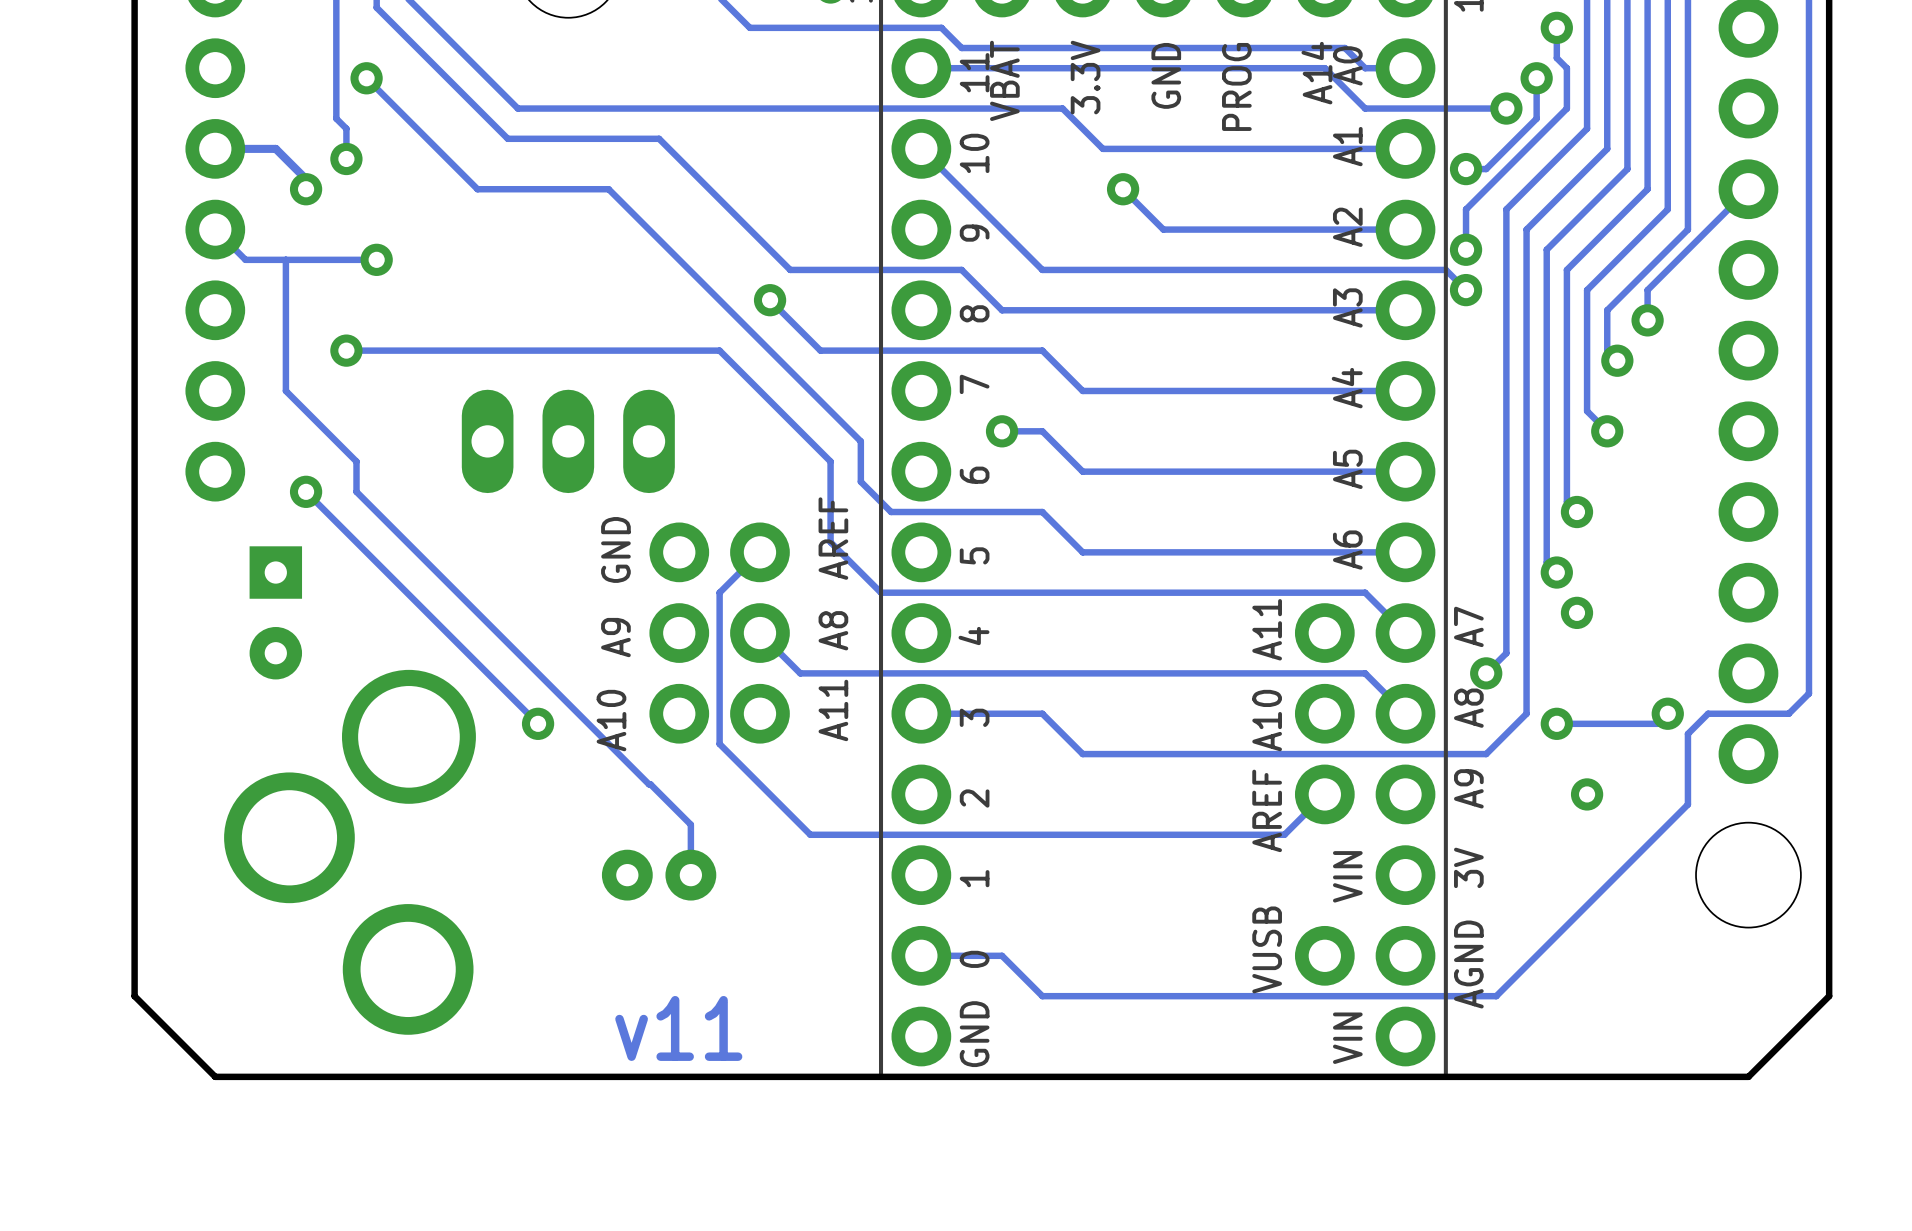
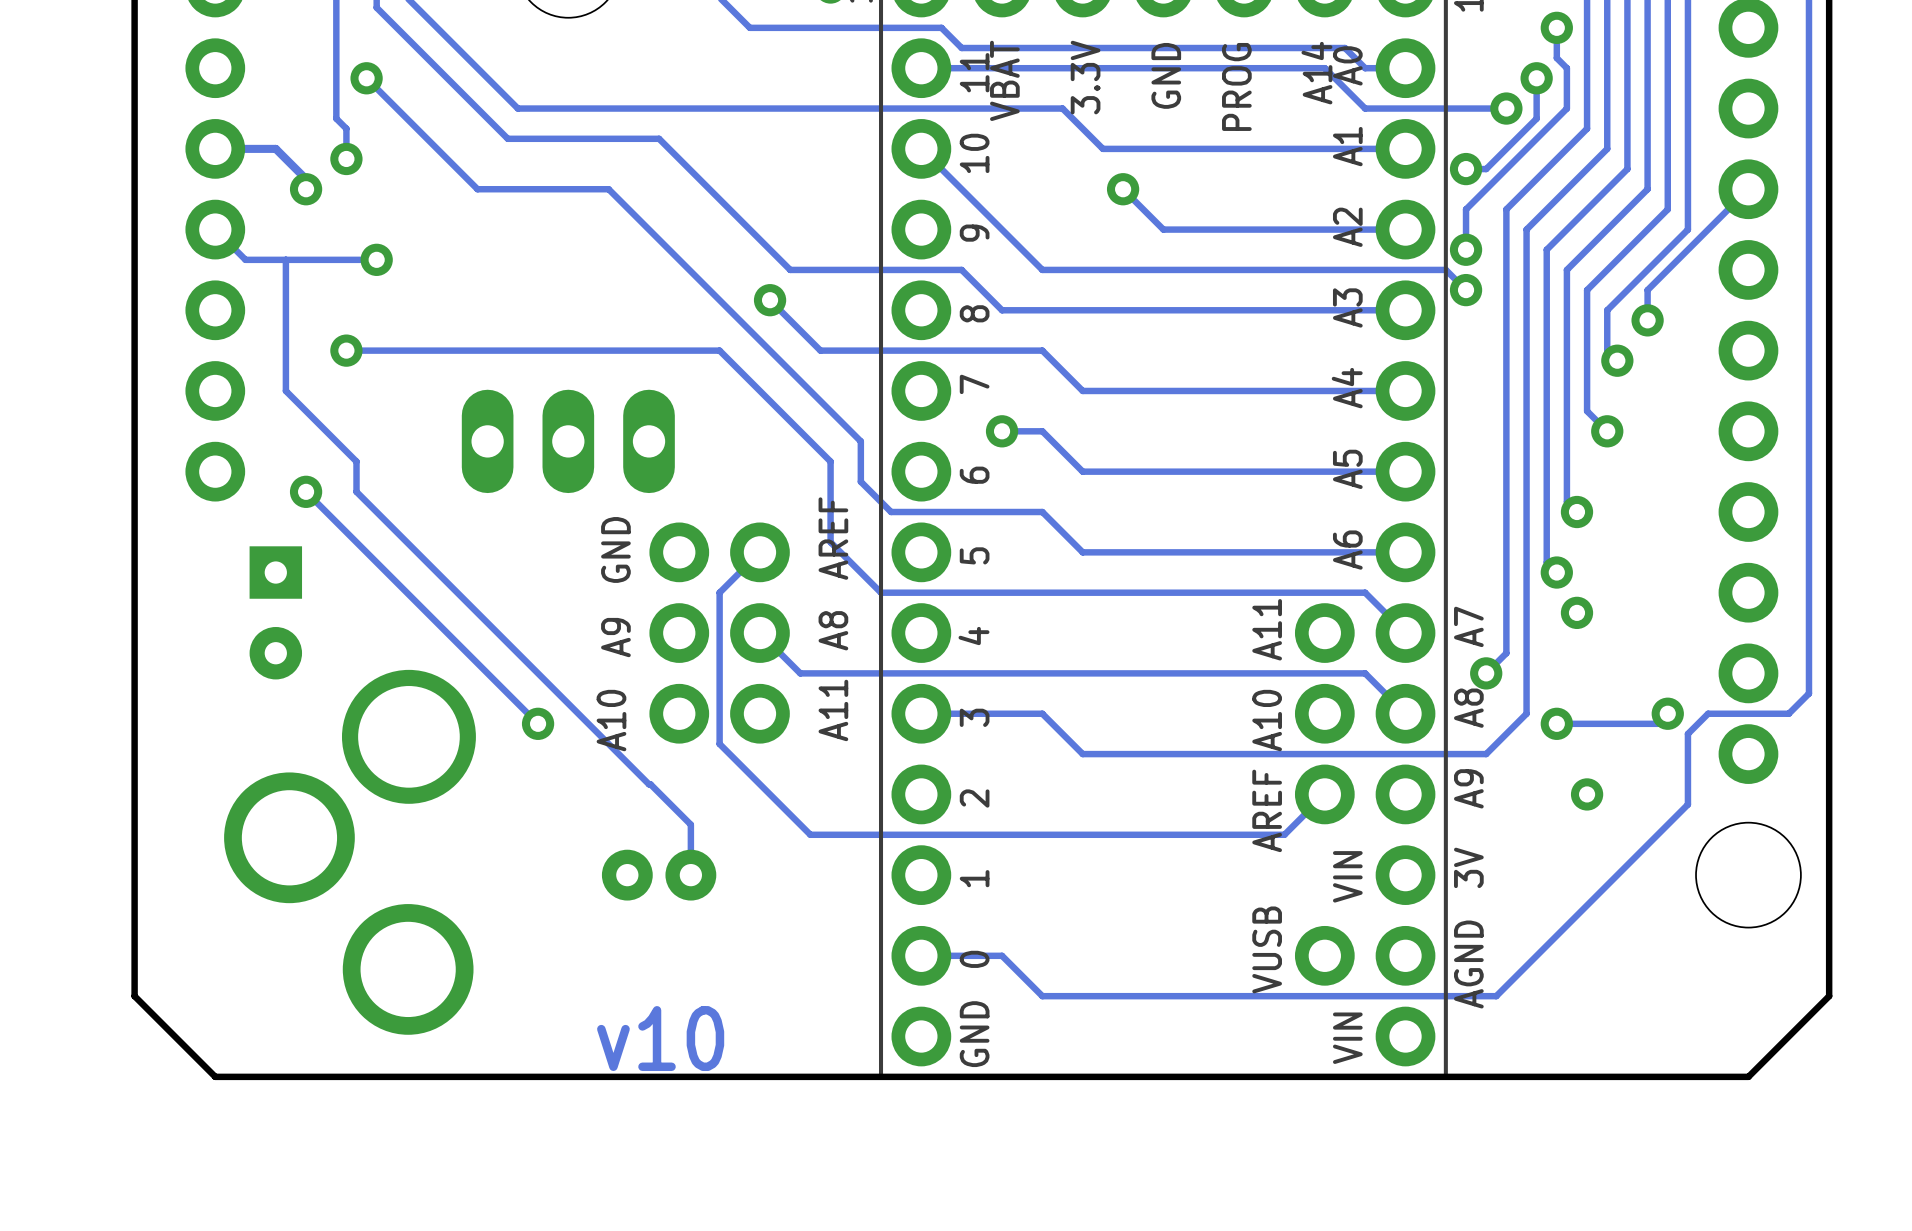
drawing: none -> [597, 1006, 725, 1072]
text: v11 (678, 1028) -> none

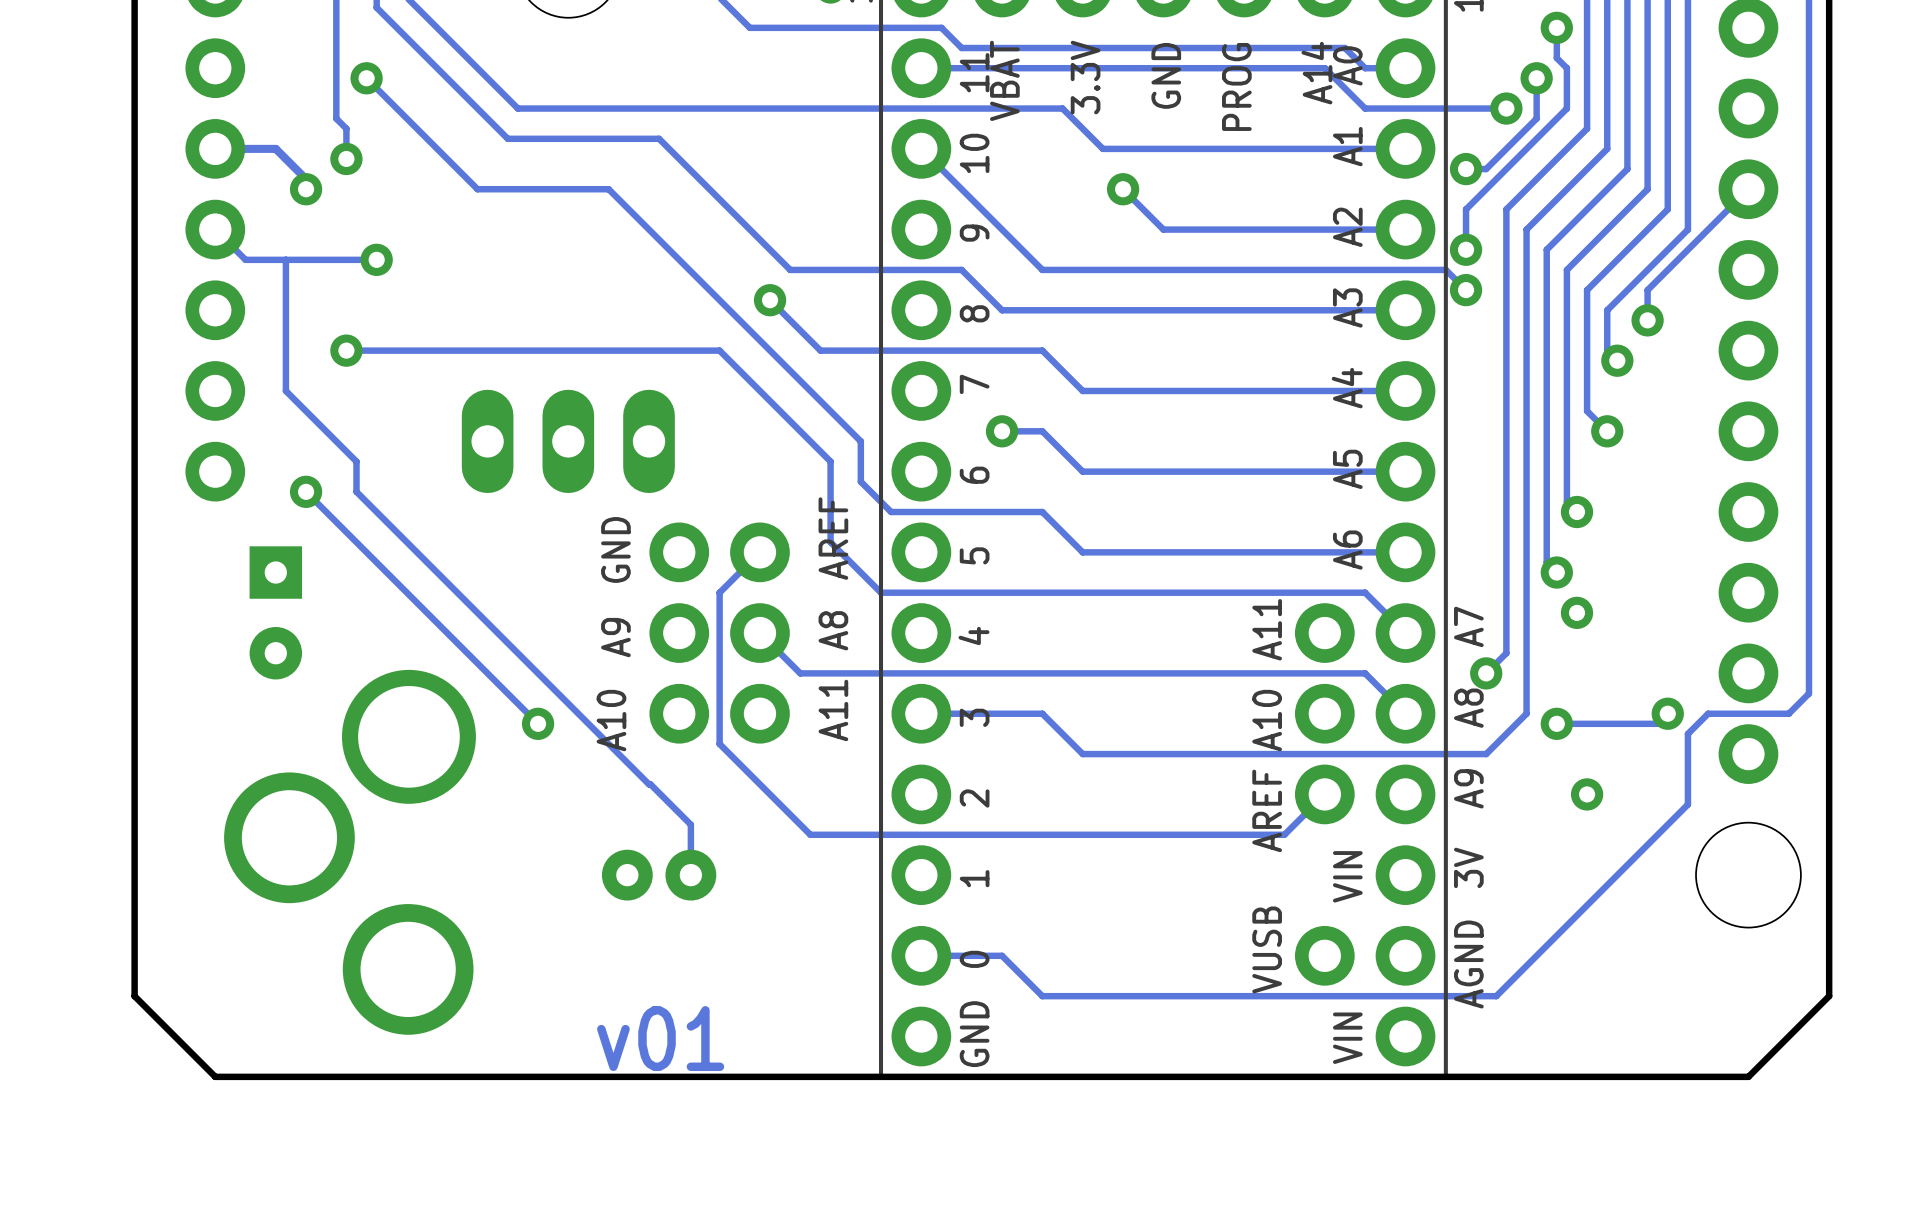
drawing shape: [597, 1006, 725, 1072] -> [597, 1006, 725, 1072]

